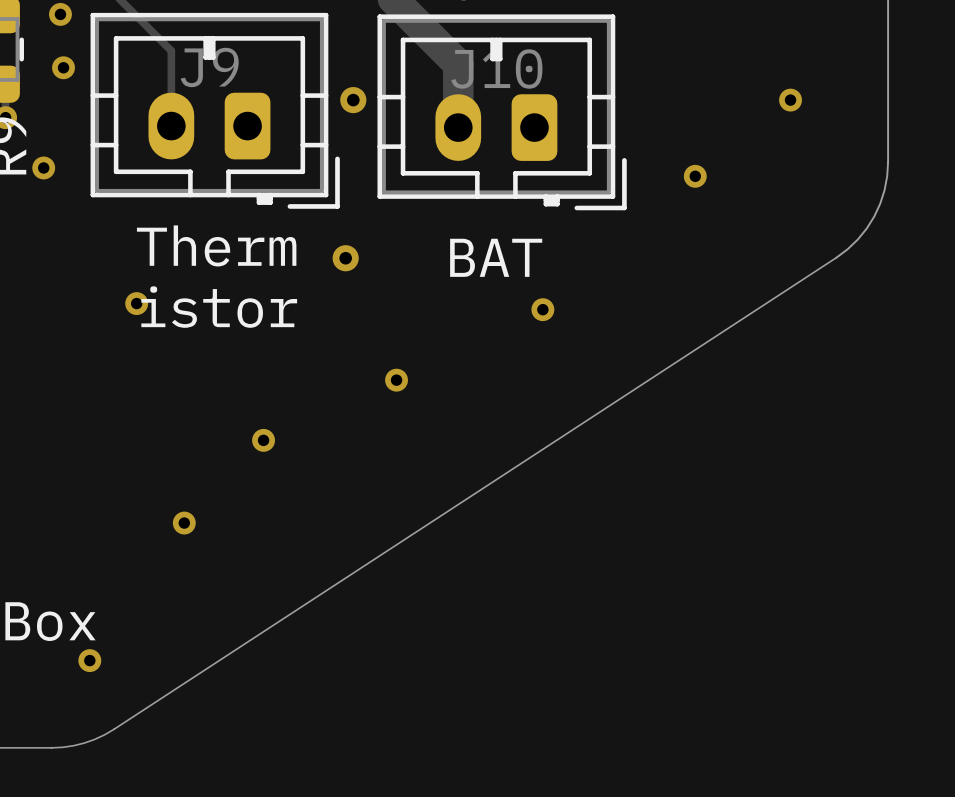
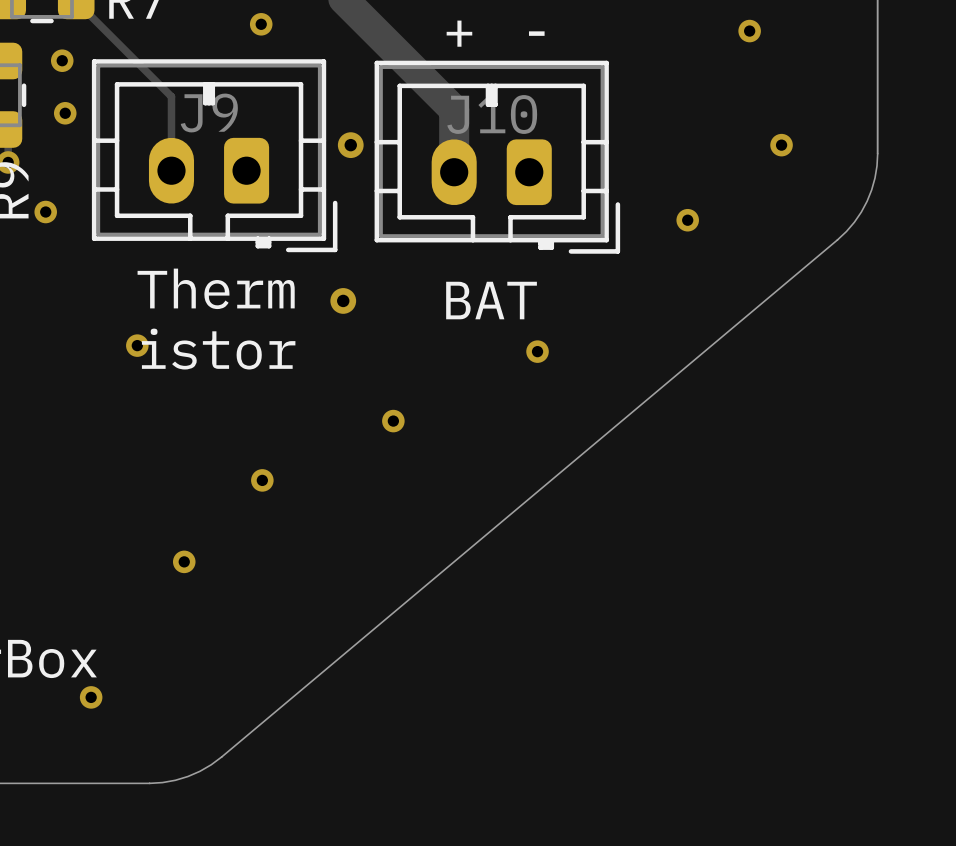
board edge: (888, 108) (888, 162) (884, 190) (874, 216) (866, 228) (847, 249) (114, 729) (84, 743) (51, 747) -> (877, 153) (875, 178) (867, 201) (854, 222) (837, 239) (221, 756) (199, 771) (175, 780) (162, 782) (53, 783)

